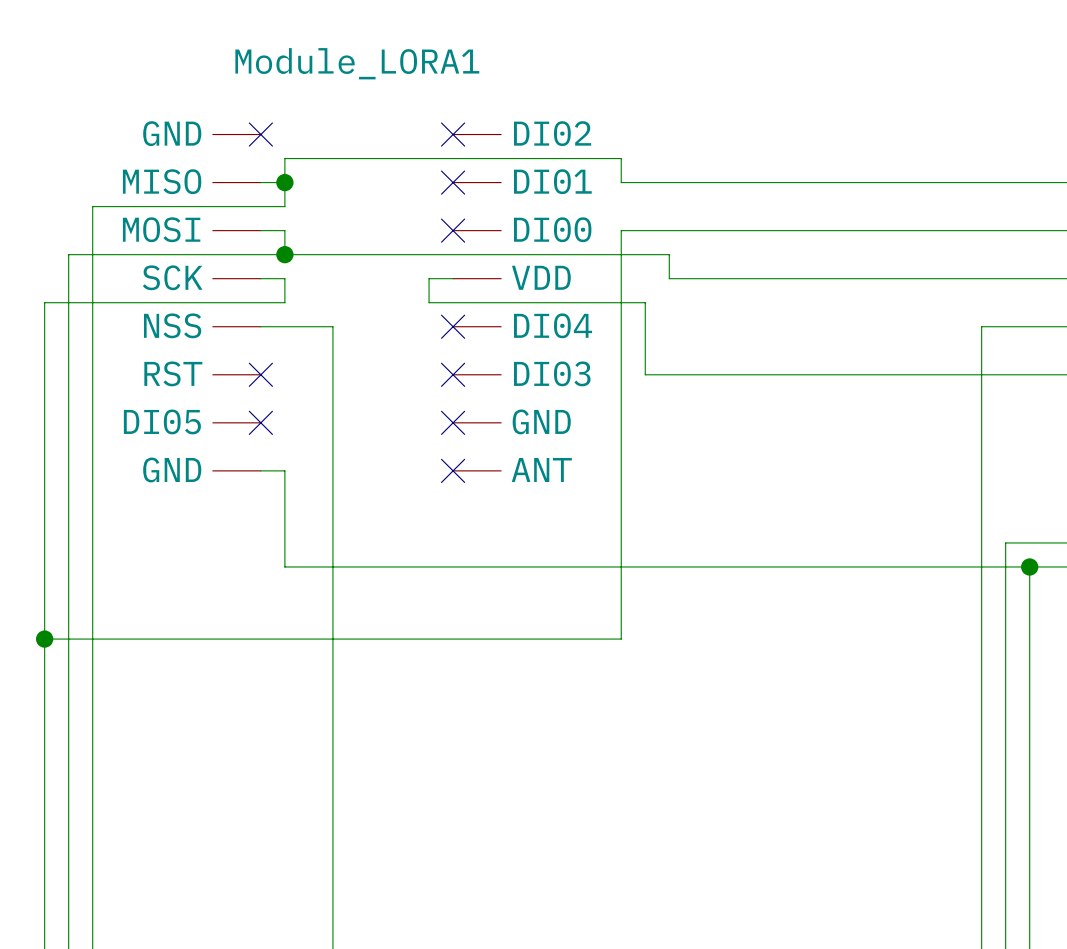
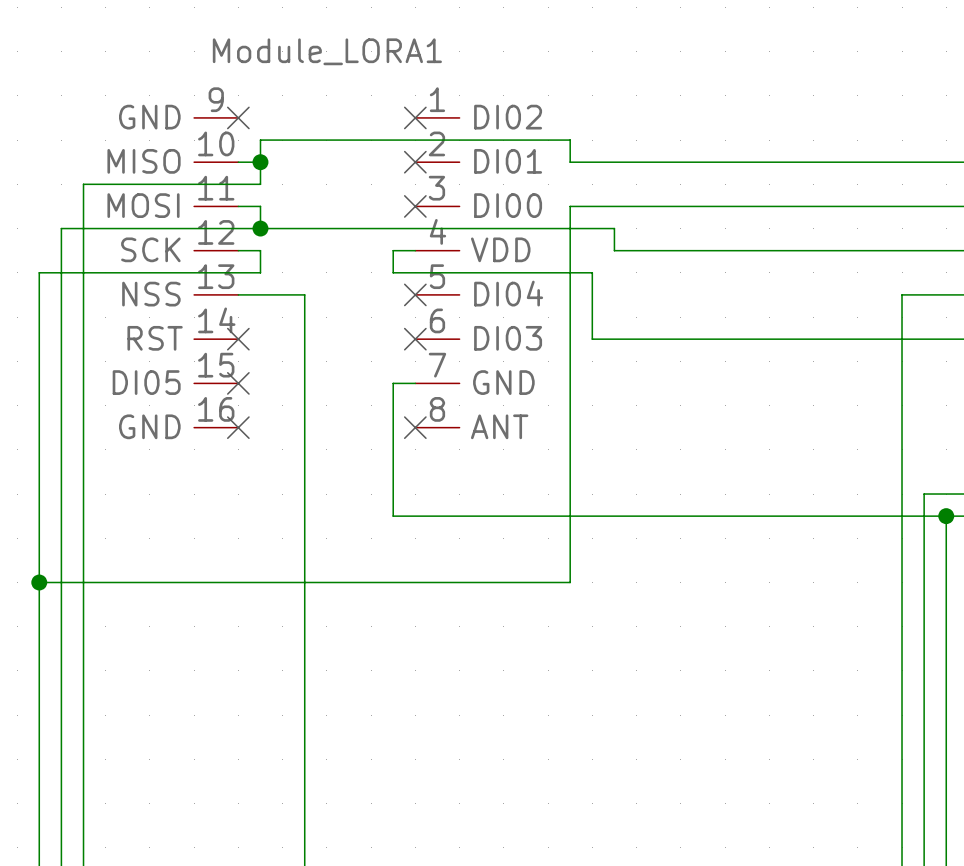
Module_LORA1 symbol: [212, 134, 502, 471] -> [194, 117, 460, 428]
no-connect mark: (453, 422) -> none
wire: (260, 470) (284, 470) (284, 566) (429, 566) -> (415, 383) (393, 383) (393, 516)
no-connect mark: none -> (238, 427)

